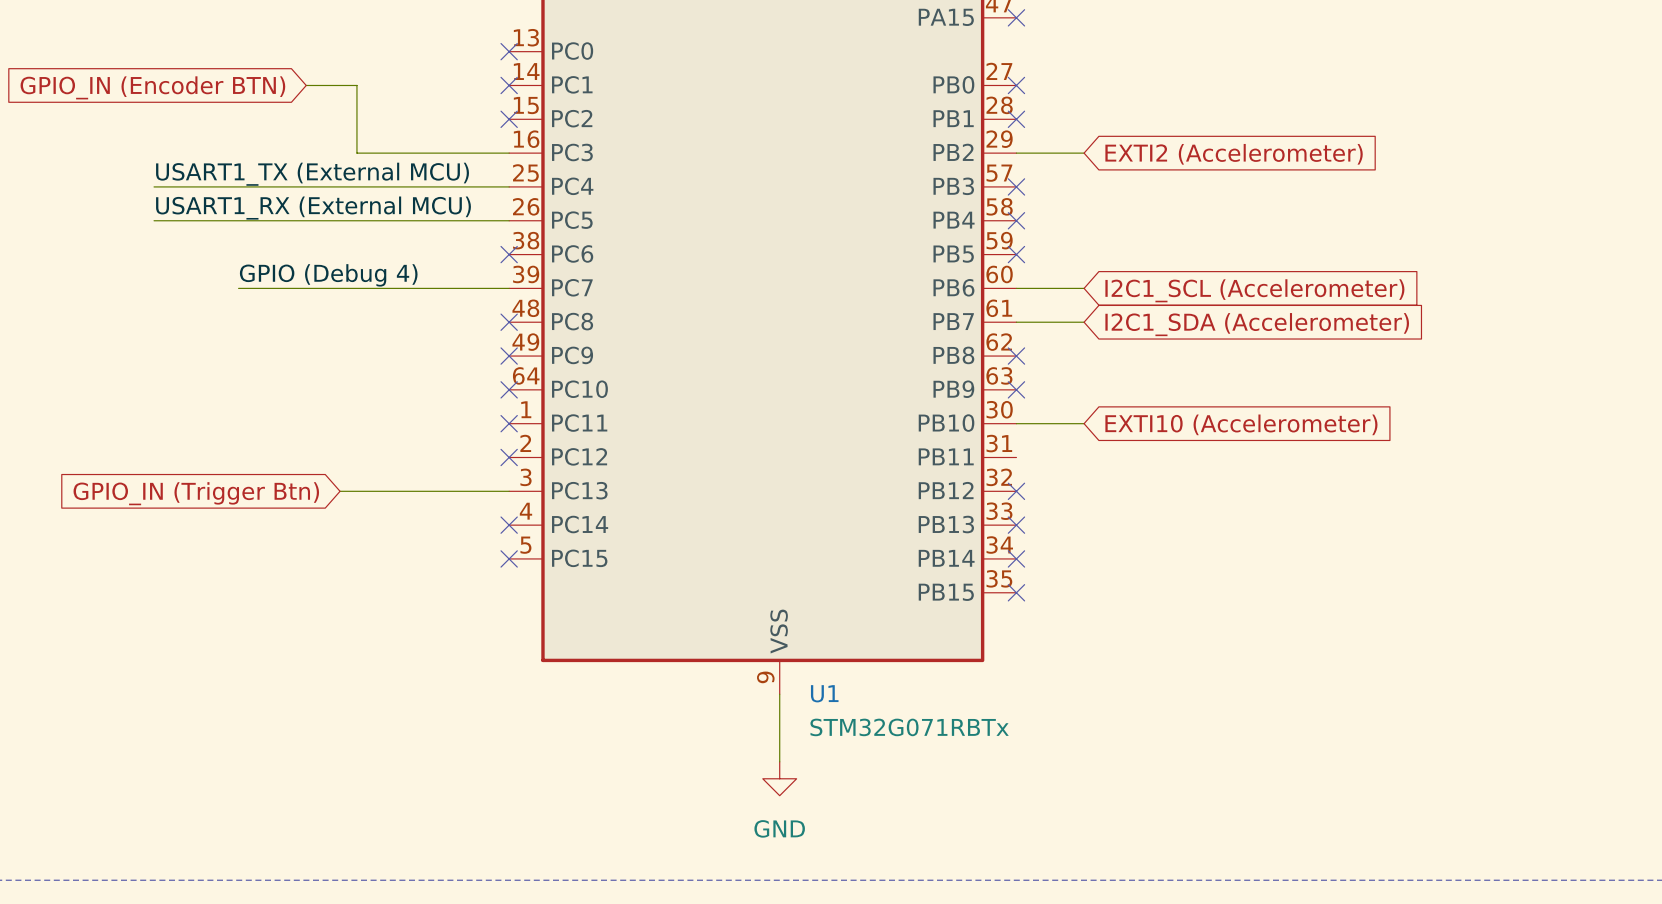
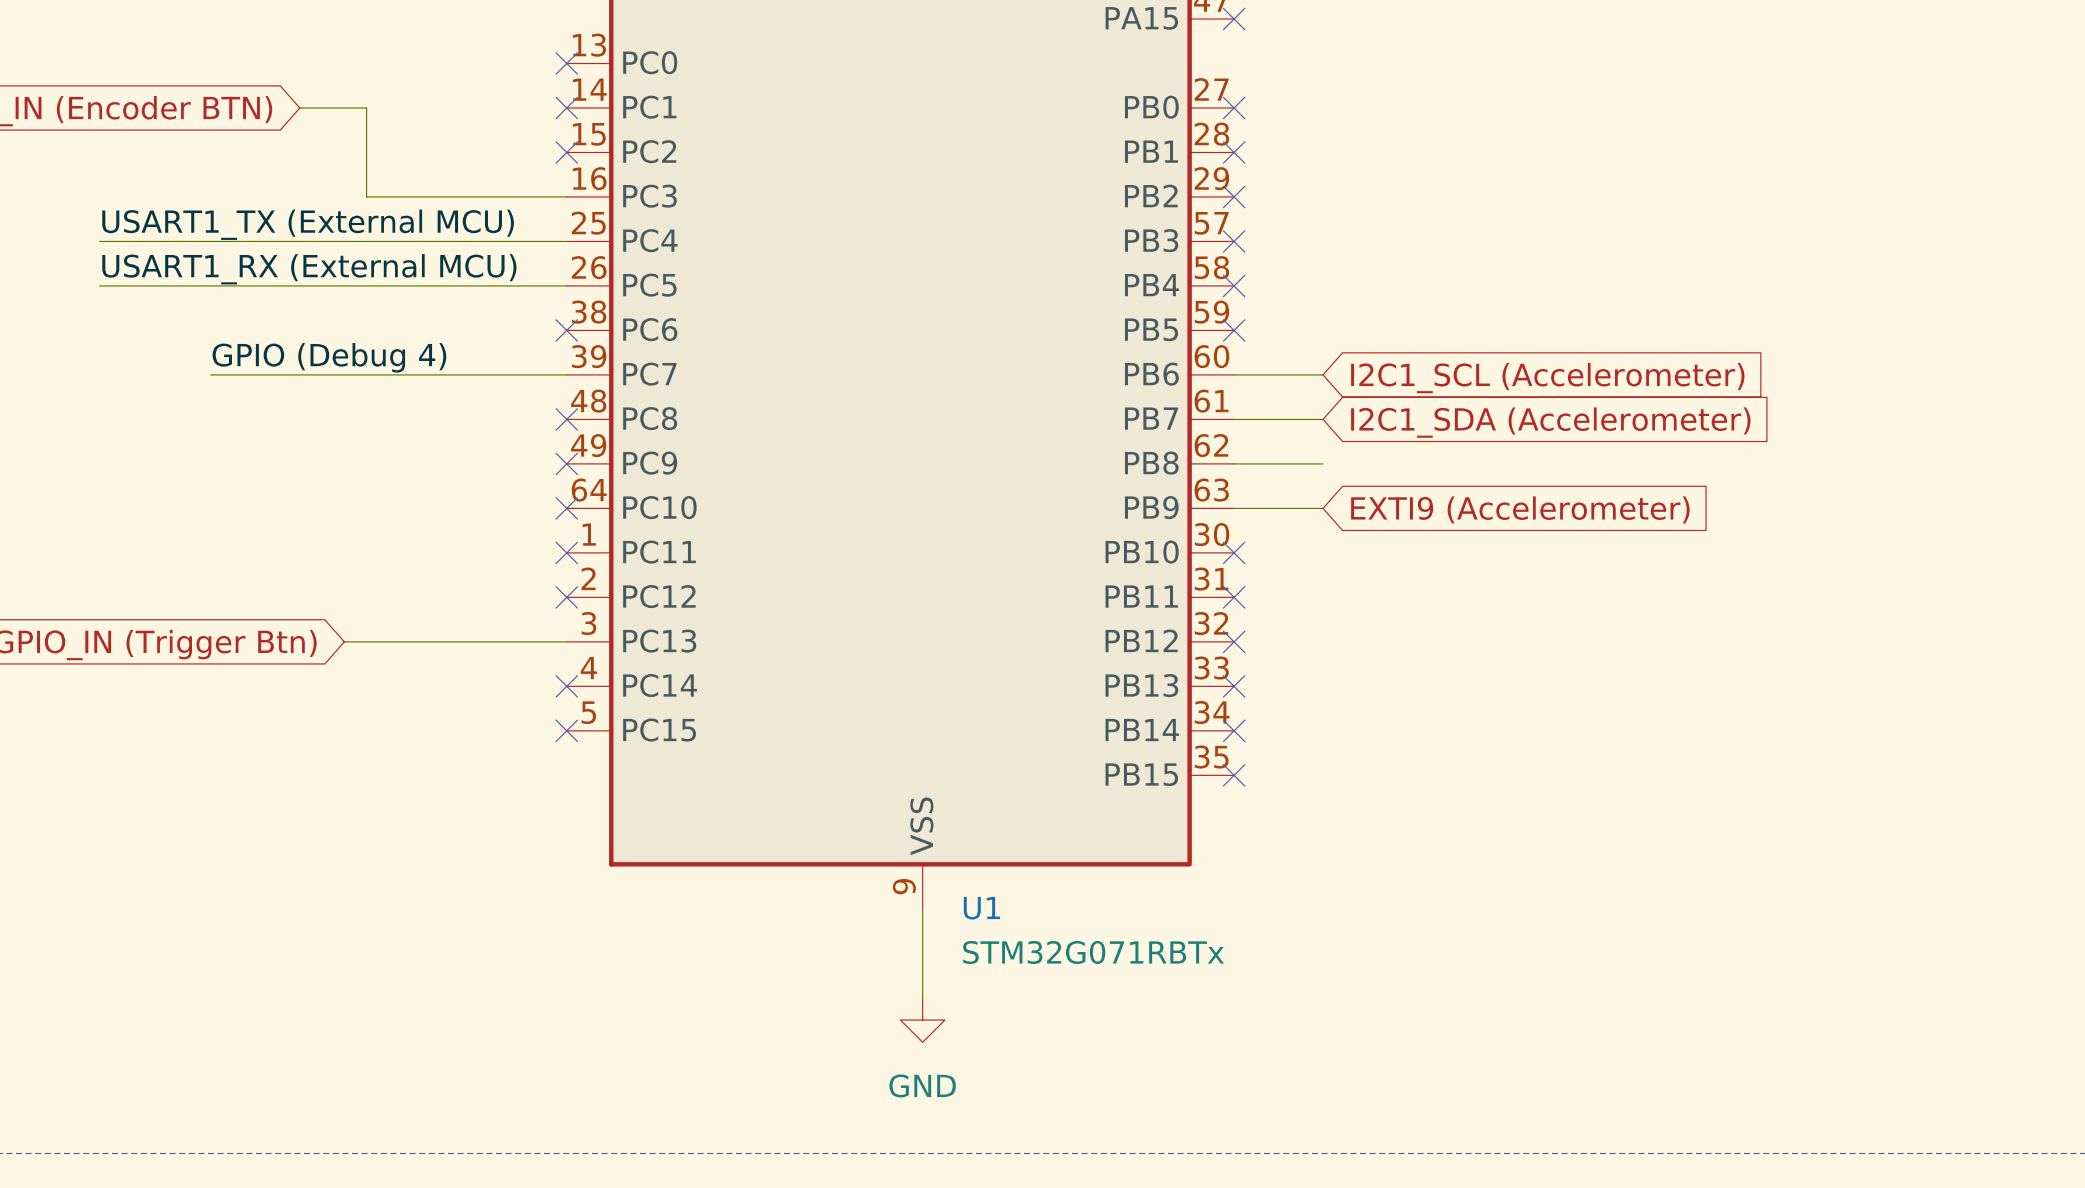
wire: (1016, 153) (1084, 153) -> (1234, 463) (1323, 463)
no-connect mark: none -> (1234, 196)
global label: EXTI2 (Accelerometer) (1234, 154) -> none
no-connect mark: (1016, 356) -> none
no-connect mark: (1016, 389) -> none
wire: (1016, 423) (1084, 423) -> (1234, 508) (1323, 508)
no-connect mark: none -> (1234, 552)
global label: EXTI10 (Accelerometer) (1241, 424) -> EXTI9 (Accelerometer) (1520, 509)
no-connect mark: none -> (1234, 597)

